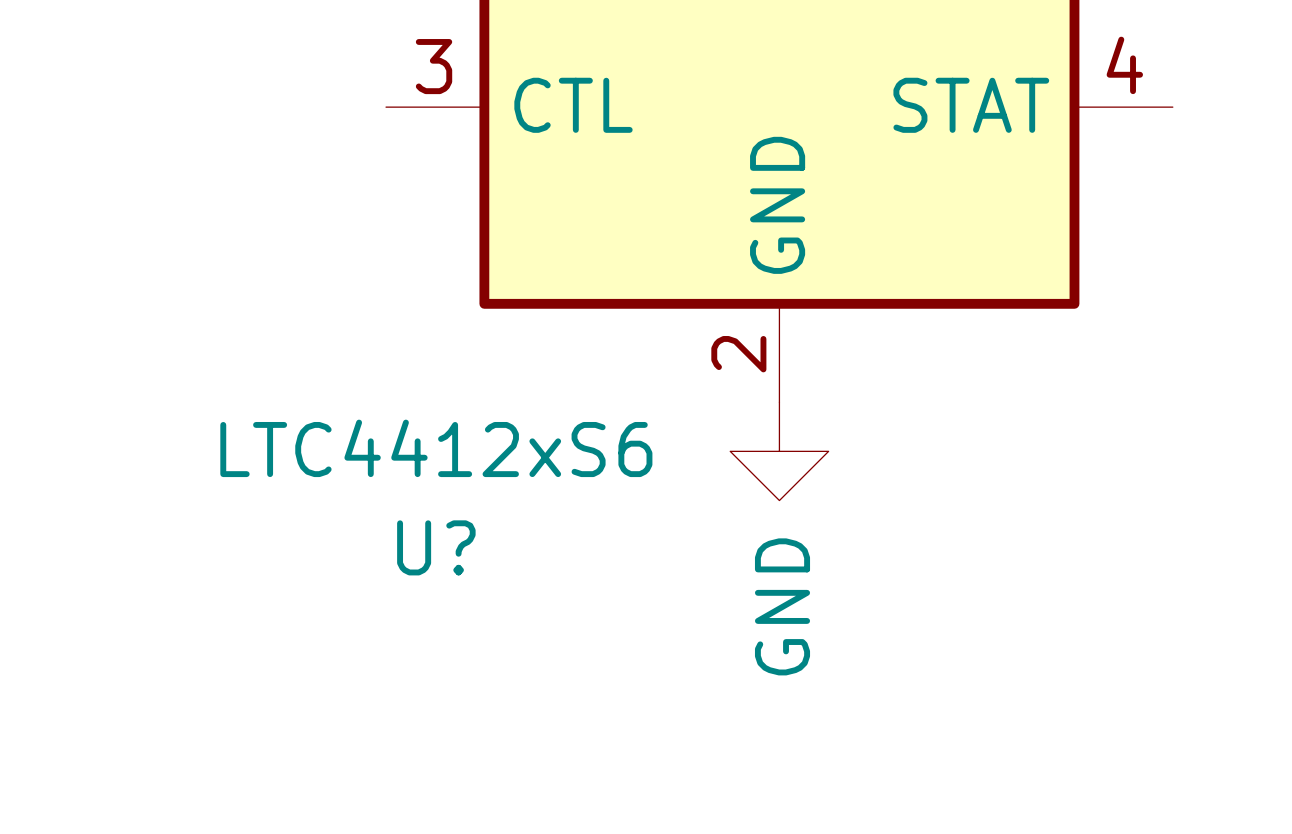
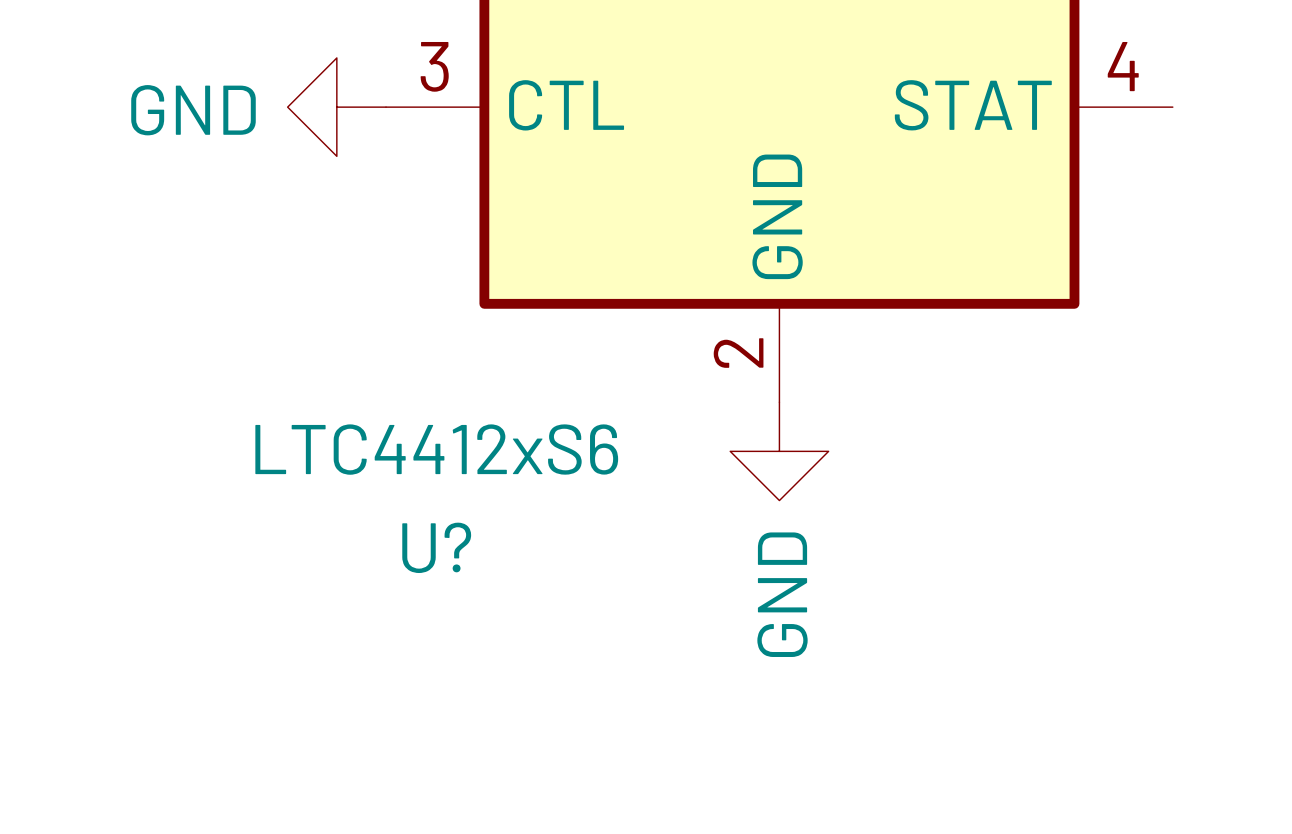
power symbol: none -> GND (336, 107)

